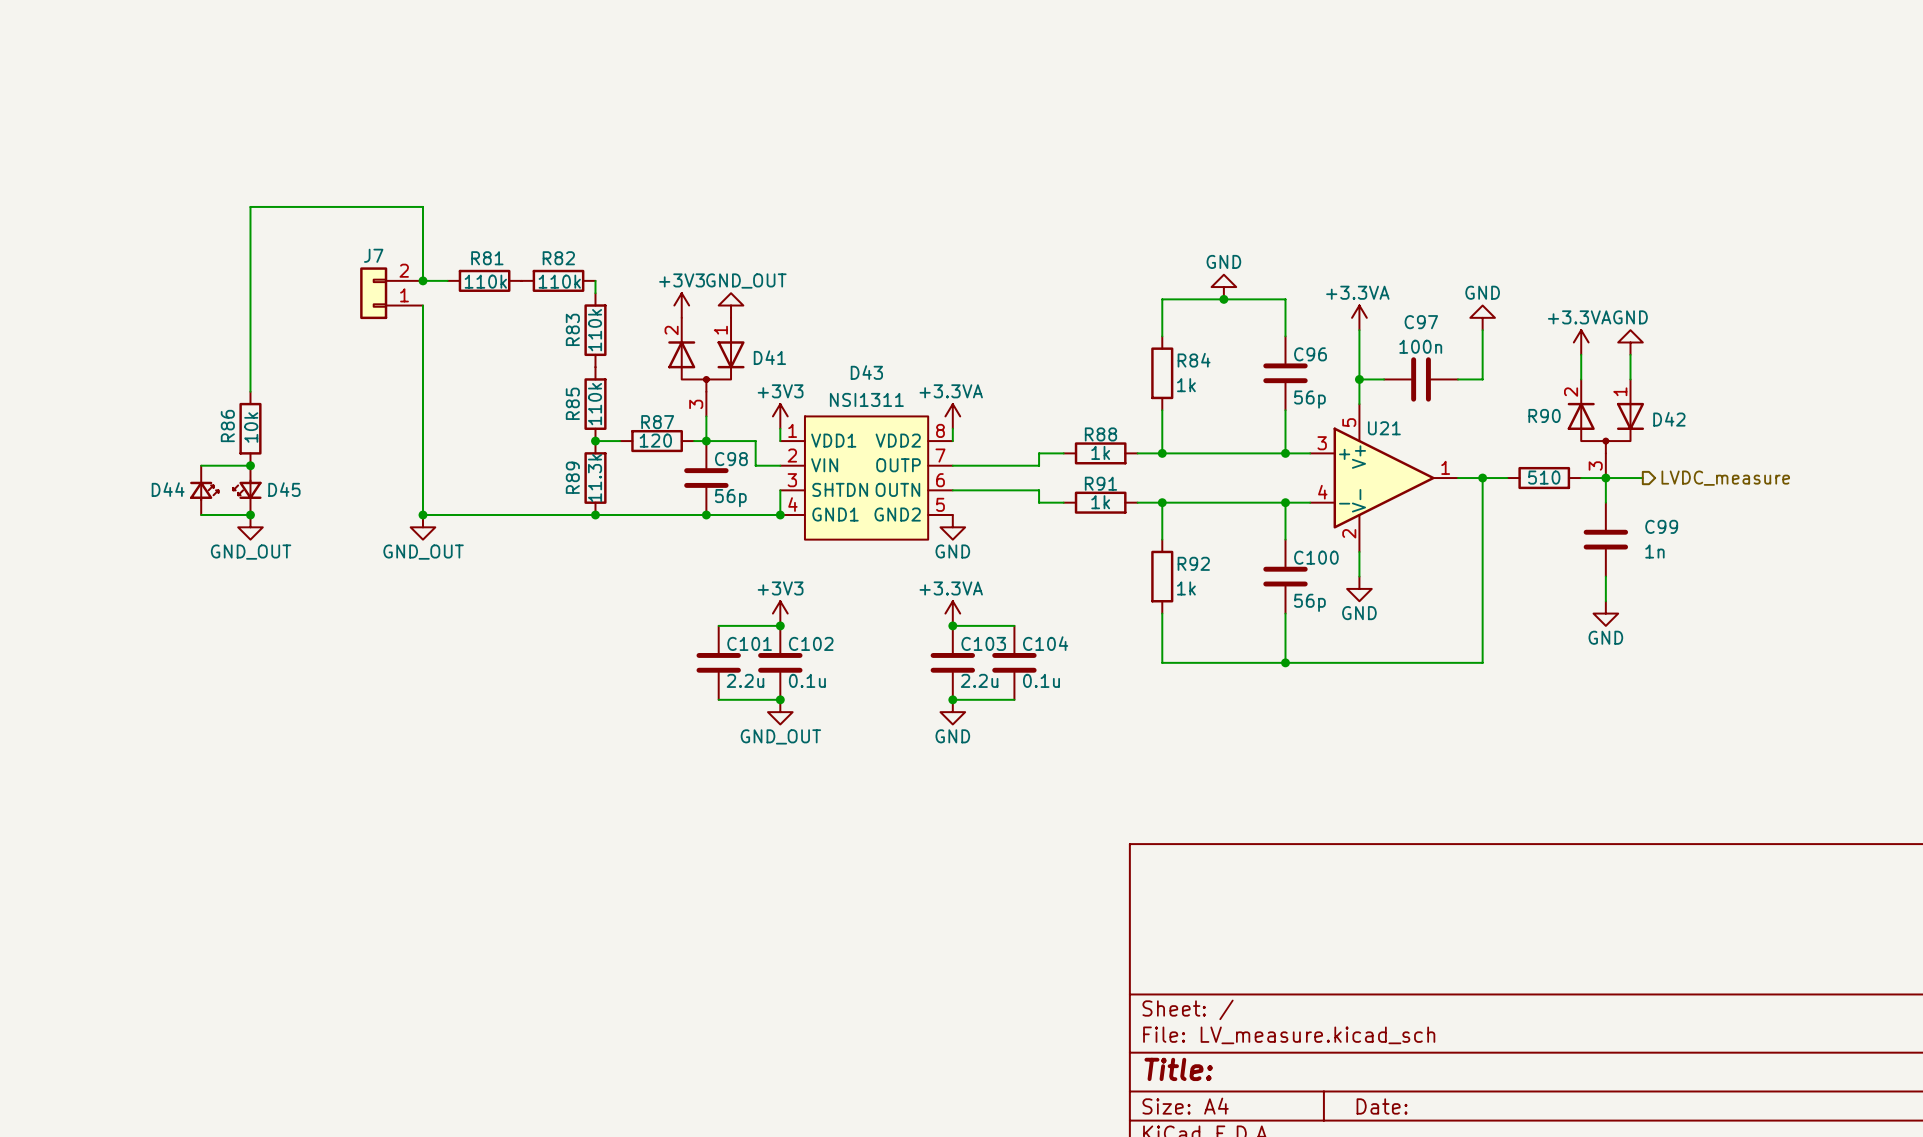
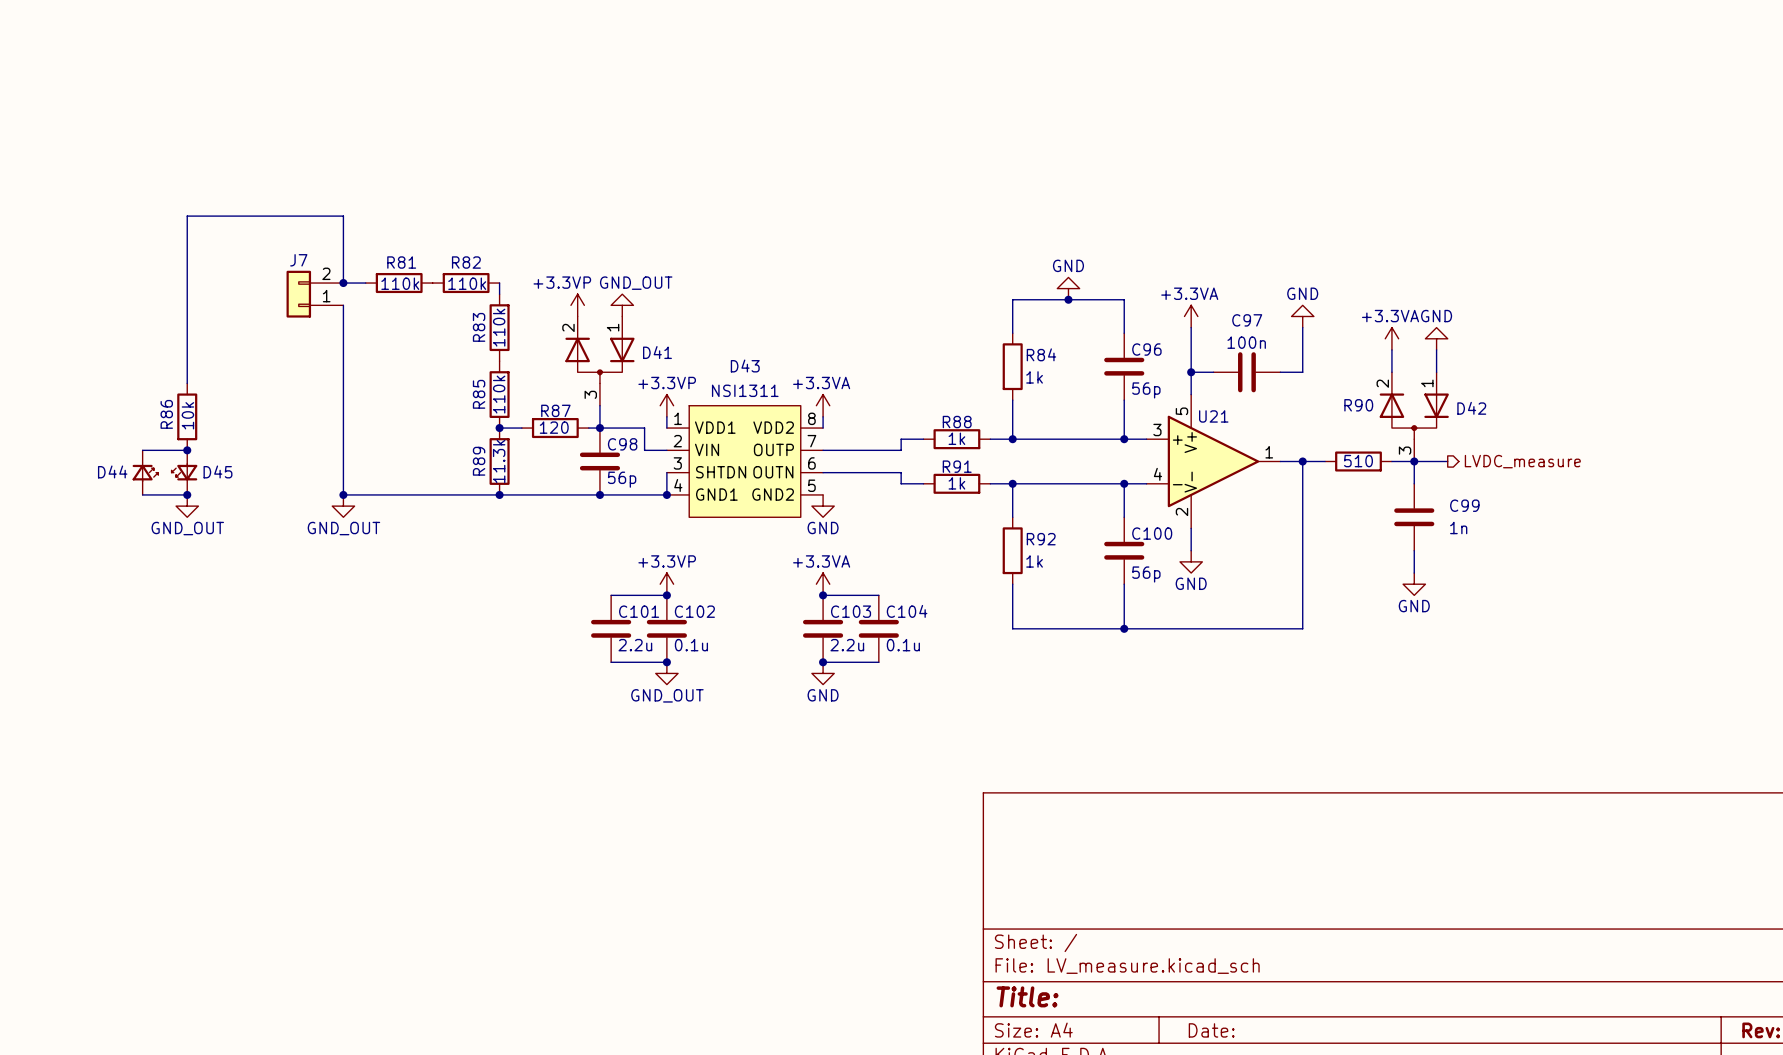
power symbol: +3V3 (681, 305) -> +3.3VP (577, 305)
power symbol: +3V3 (780, 416) -> +3.3VP (666, 405)
power symbol: +3V3 (780, 613) -> +3.3VP (666, 584)

